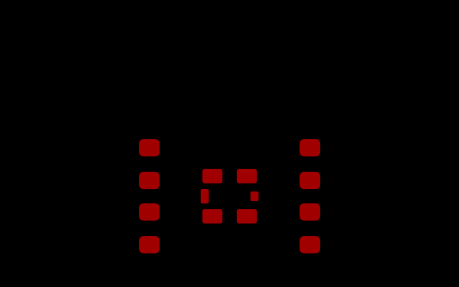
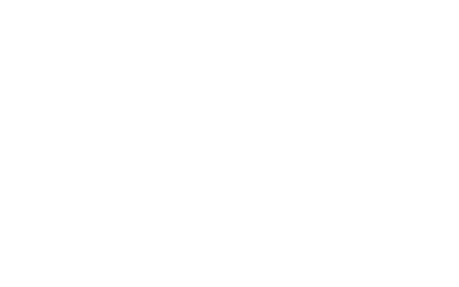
part: (149, 164) -> none
part: (309, 164) -> none
part: (229, 196) -> none
part: (149, 228) -> none
part: (309, 228) -> none

